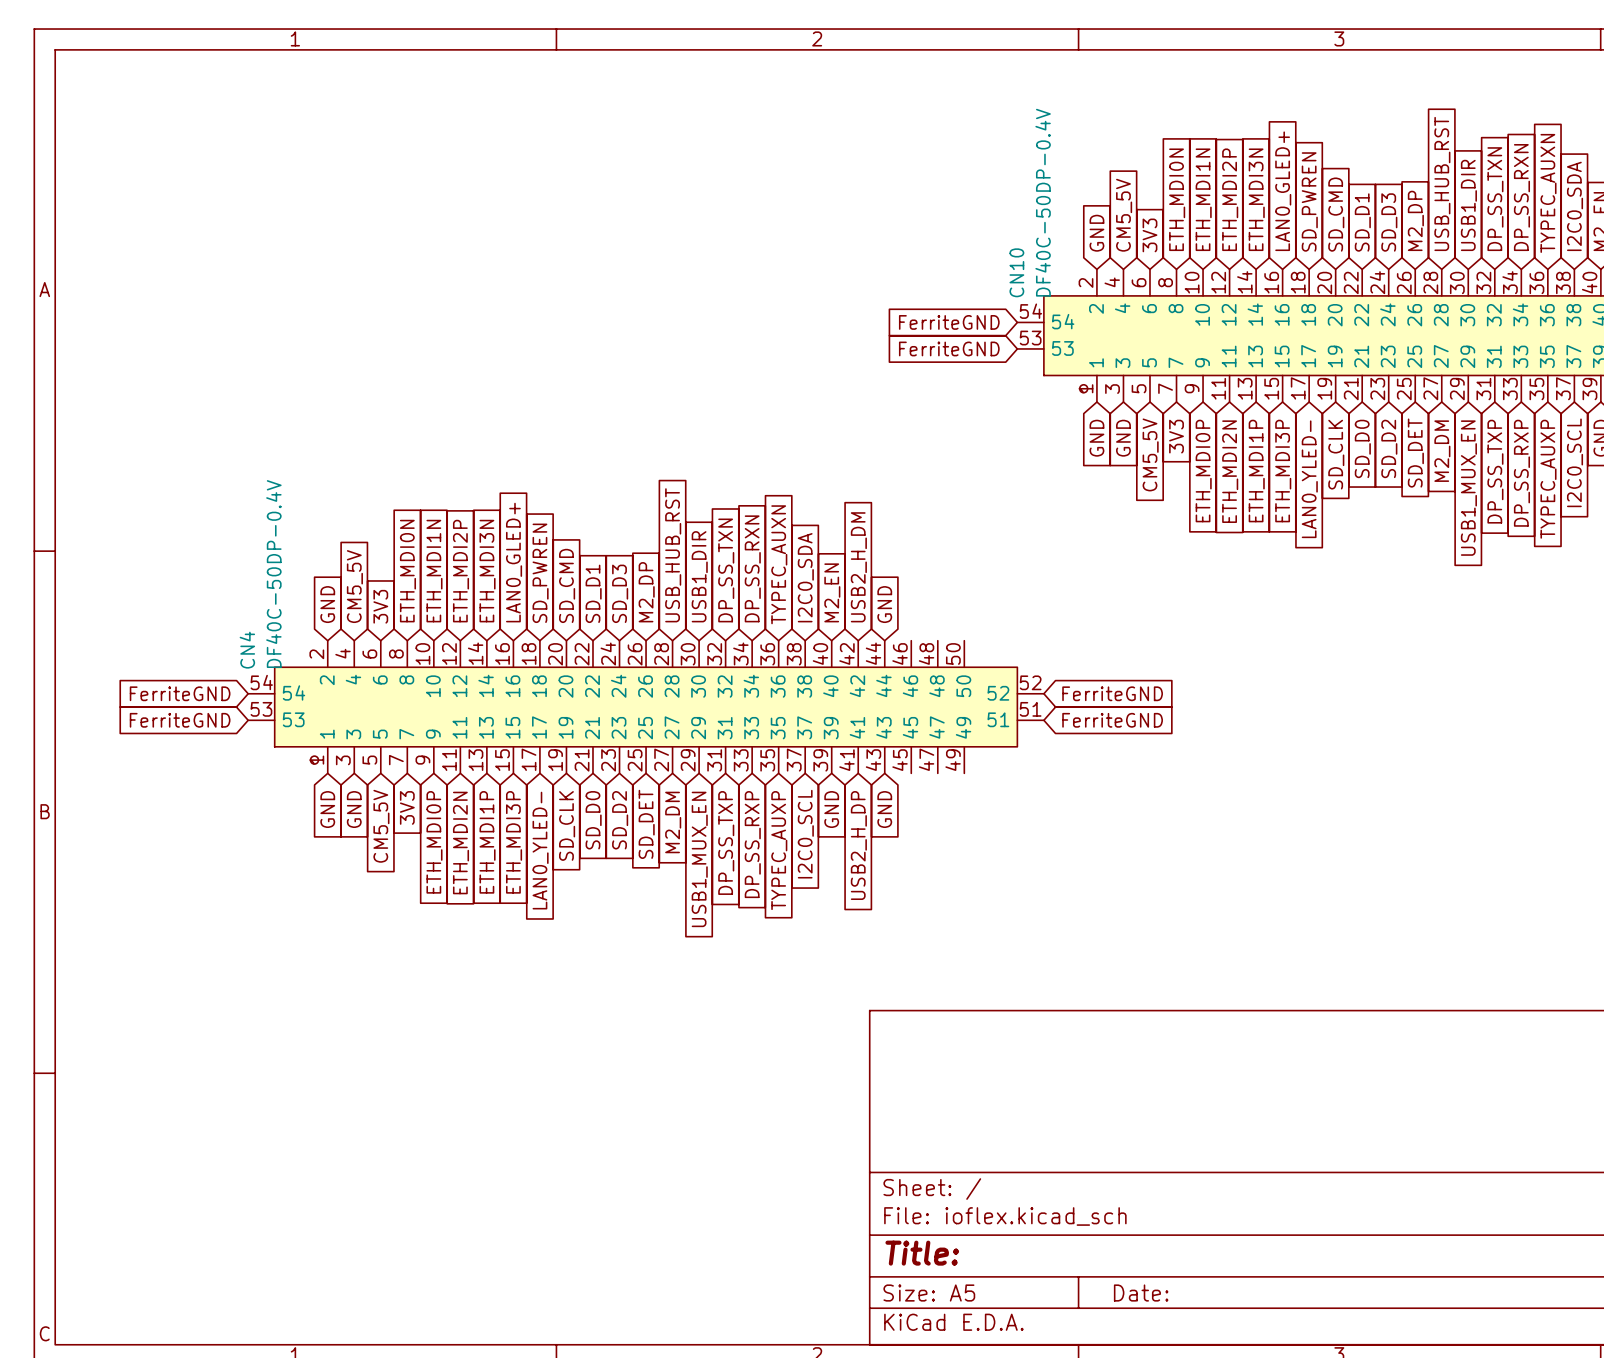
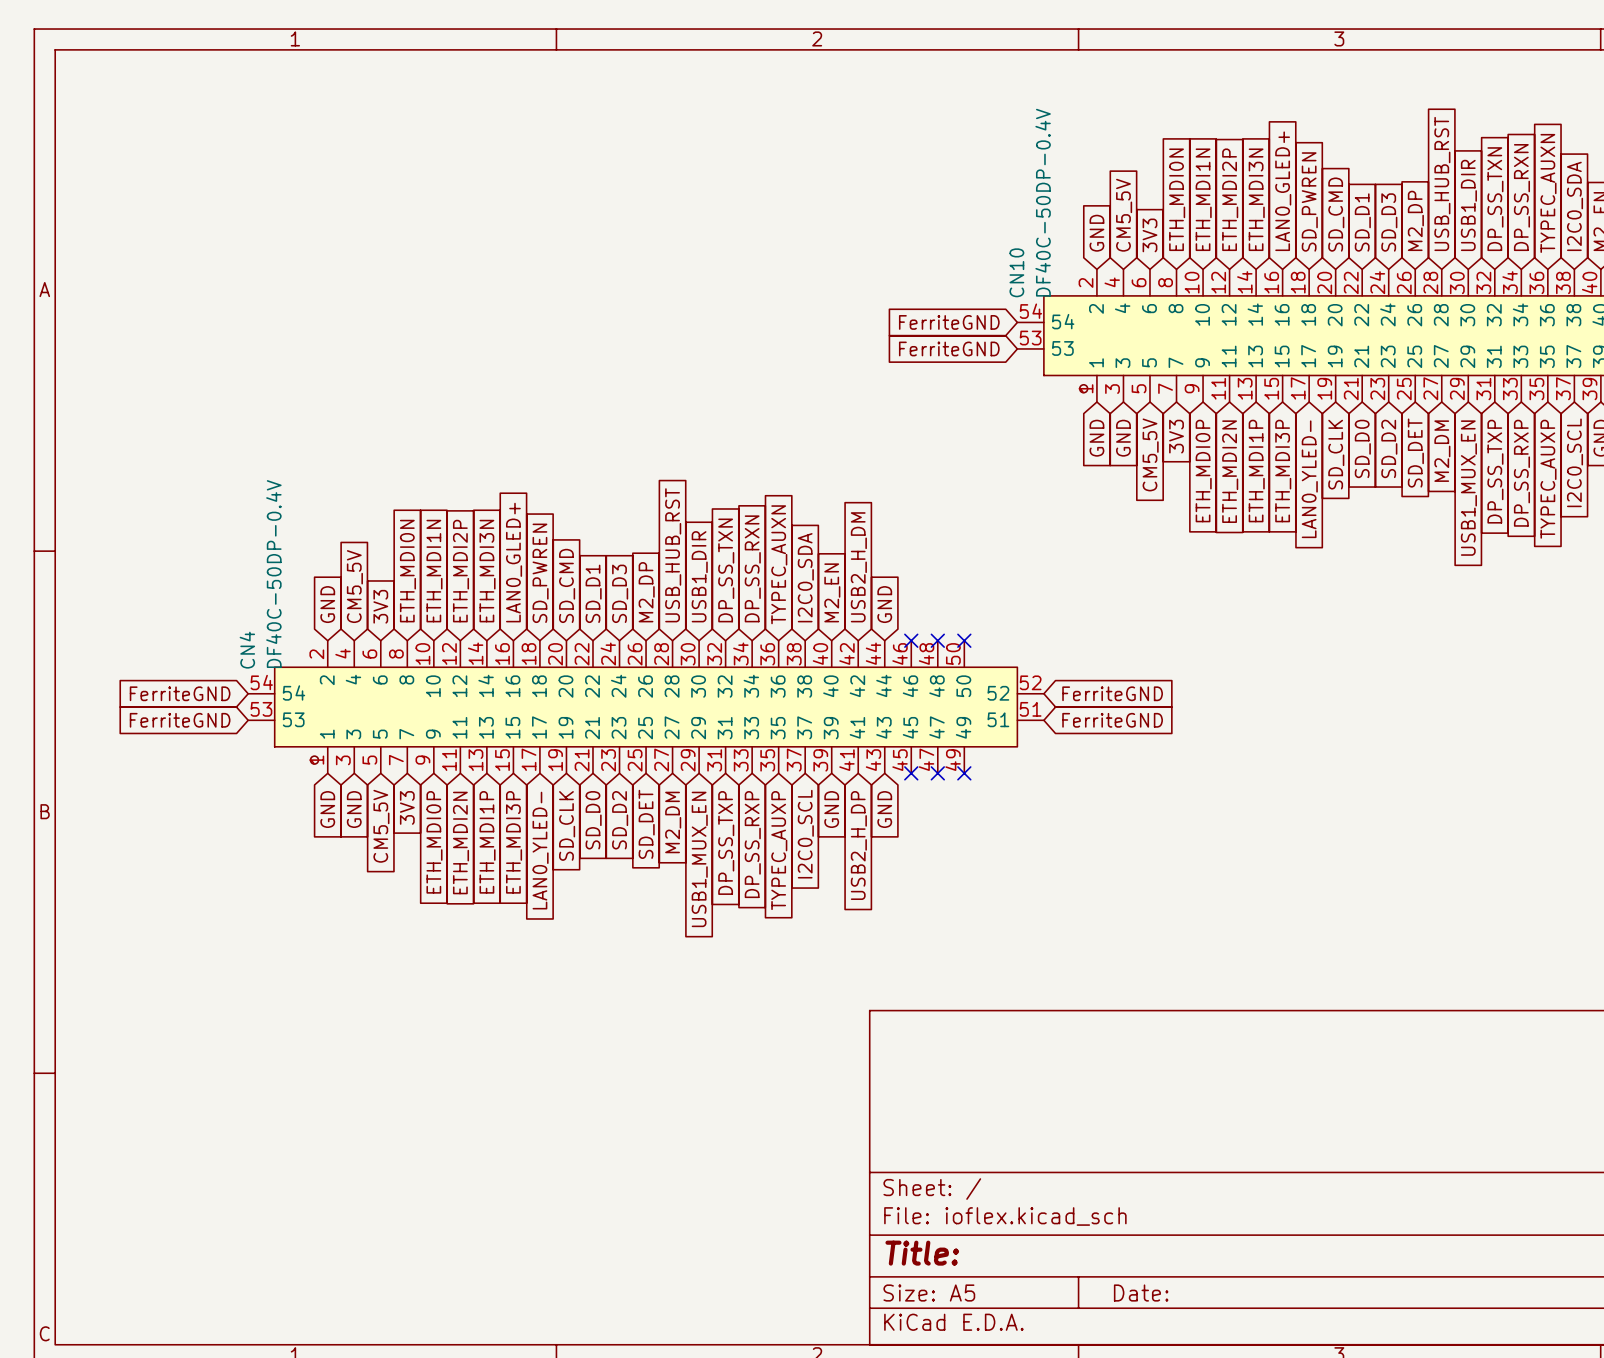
no-connect mark: none -> (911, 640)
no-connect mark: none -> (937, 640)
no-connect mark: none -> (964, 640)
no-connect mark: none -> (911, 773)
no-connect mark: none -> (937, 773)
no-connect mark: none -> (964, 773)

